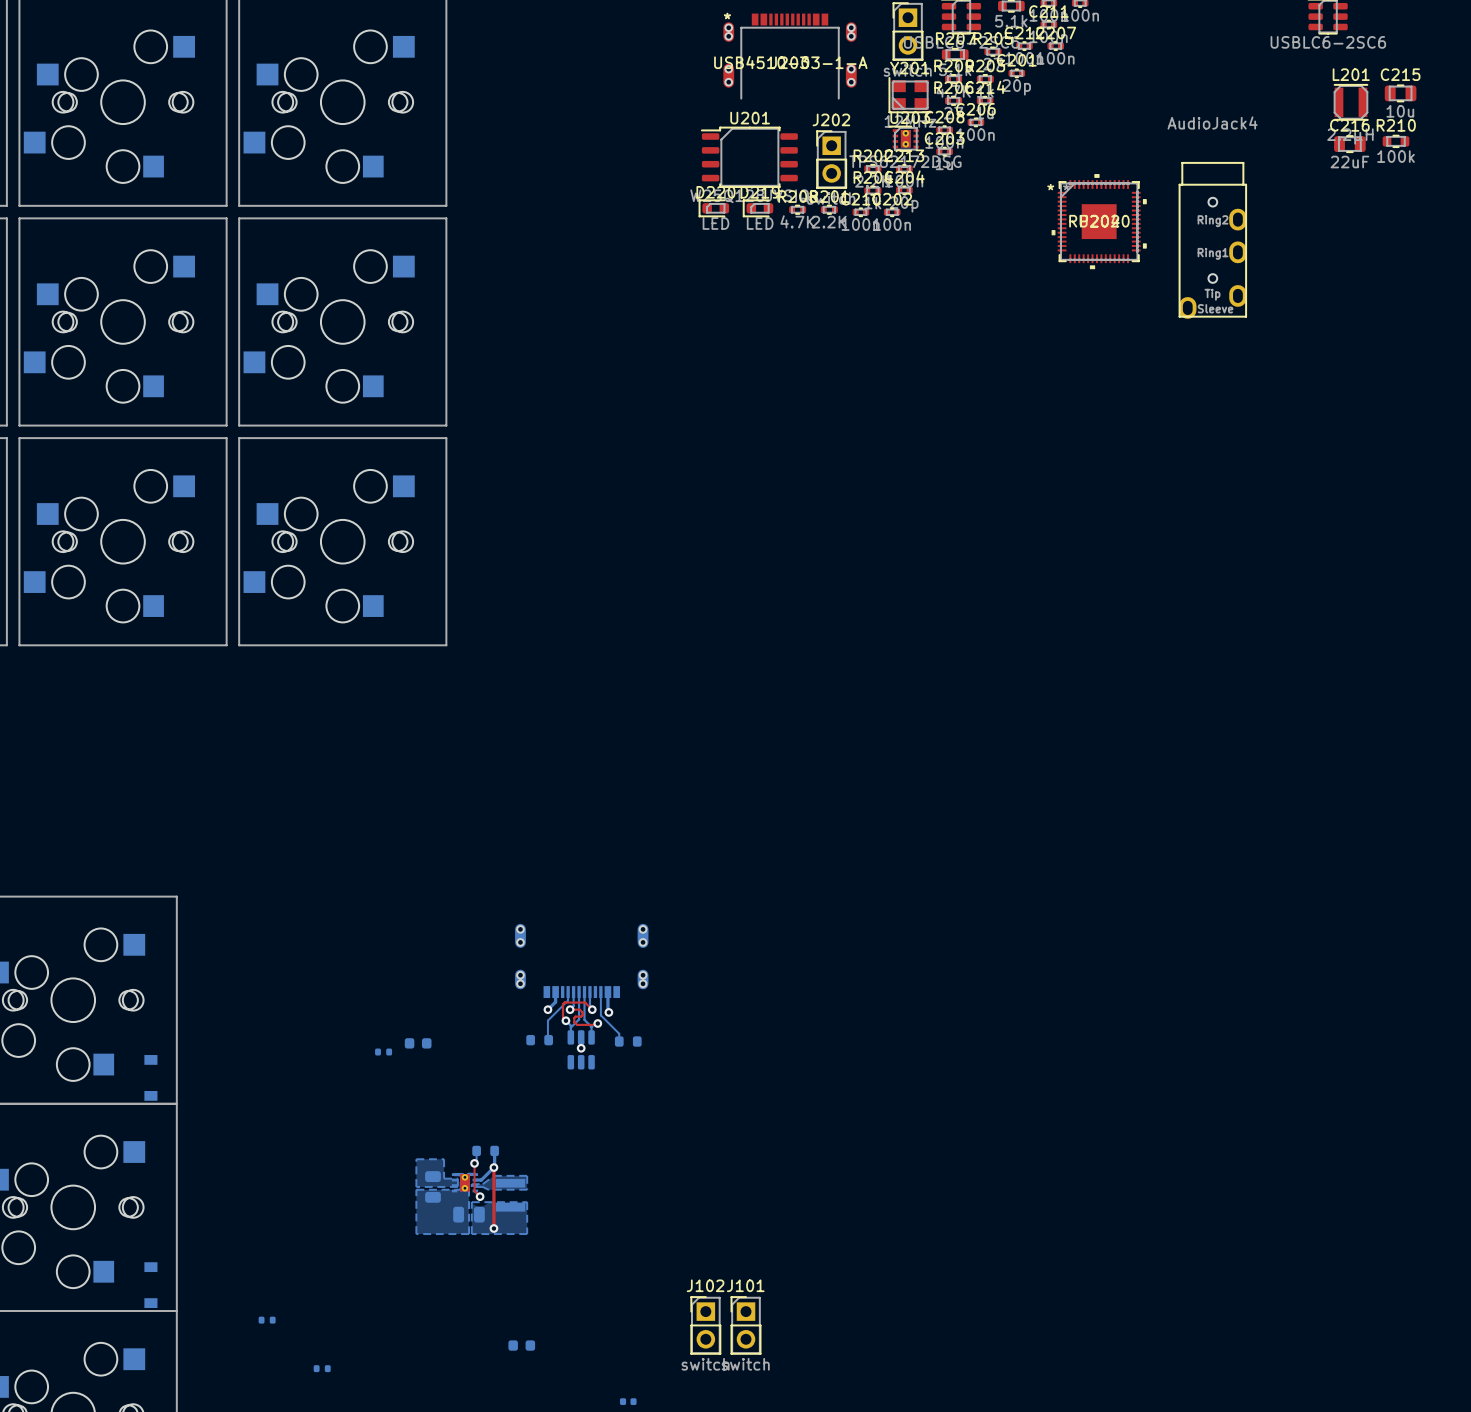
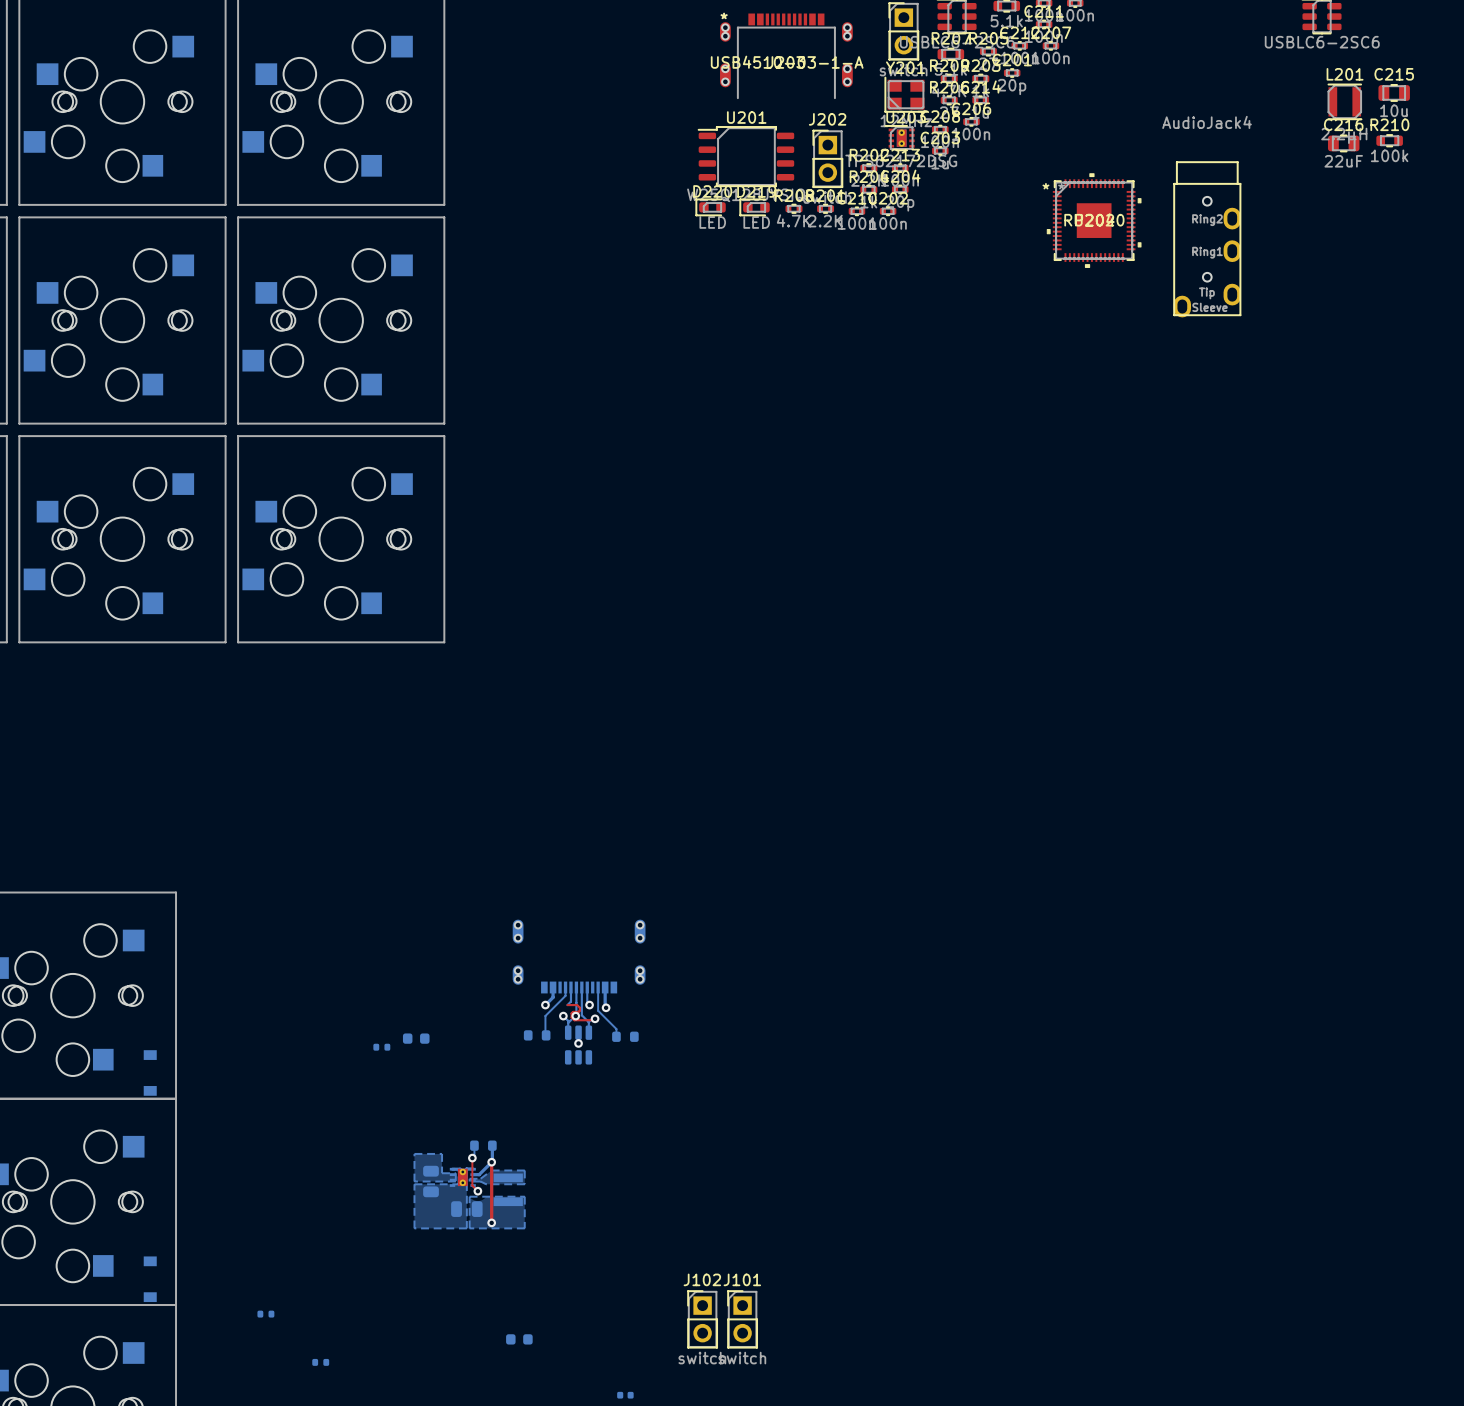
via position: (570, 1009) -> (575, 1016)
top track: (592, 1009) (585, 1002) (564, 1002) (563, 1004) (563, 1017) (565, 1020) -> none

